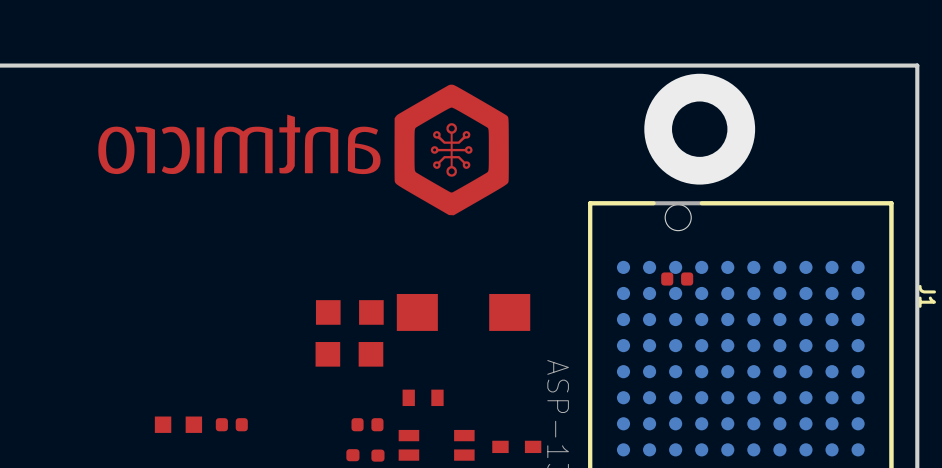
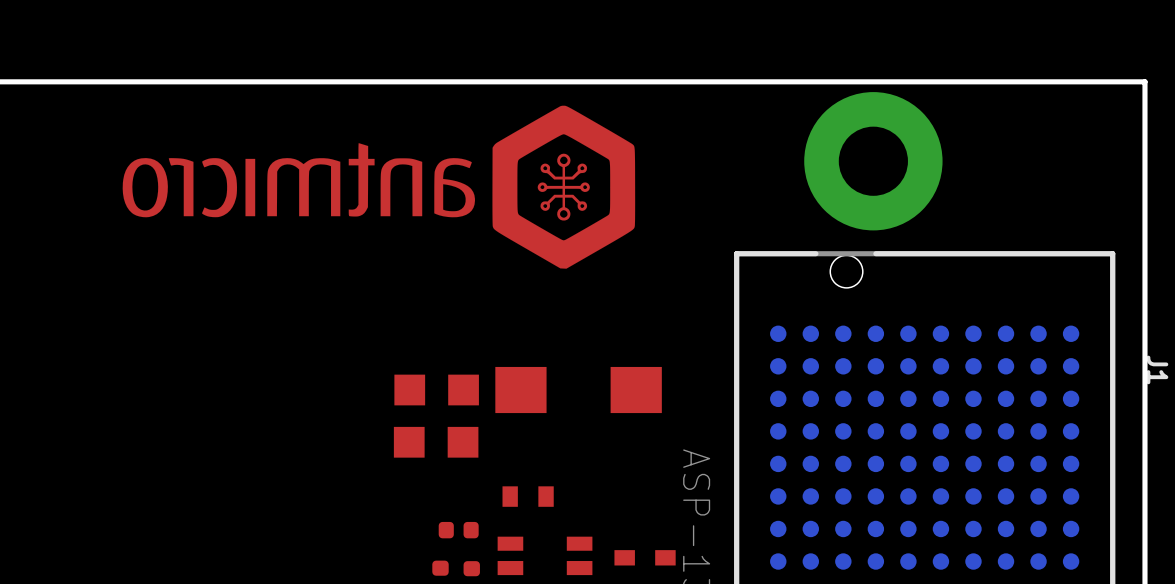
part: (677, 279) -> none
part: (178, 424) -> none
part: (231, 424) -> none

